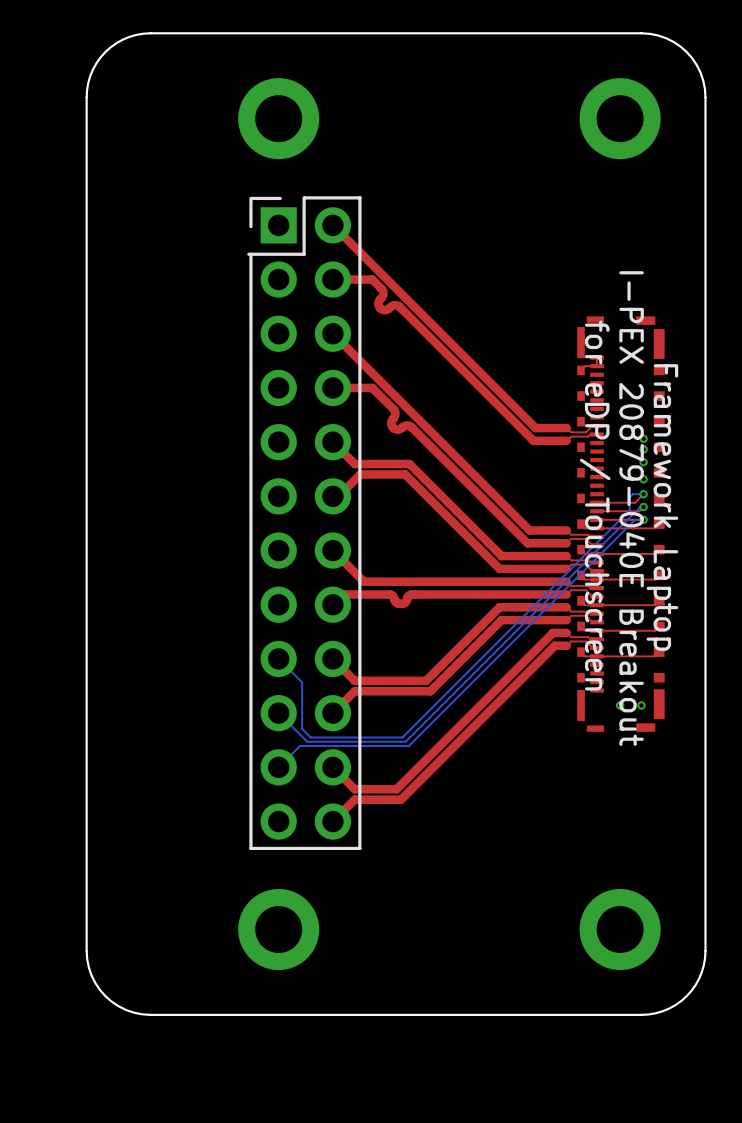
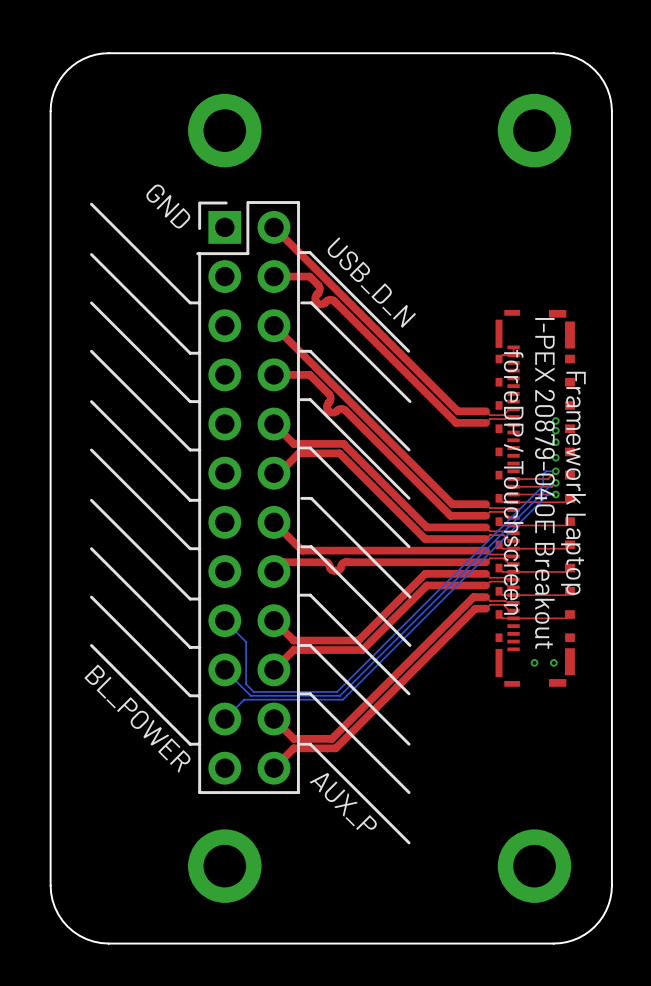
text: none -> GND (168, 206)
line: none -> (91, 204) (190, 302) (199, 302)
line: none -> (300, 252) (309, 252) (408, 351)
line: none -> (91, 254) (190, 353) (199, 353)
text: none -> USB_D_N (371, 282)
line: none -> (91, 302) (190, 401) (199, 401)
line: none -> (301, 302) (311, 302) (410, 401)
line: none -> (91, 351) (190, 449) (199, 449)
line: none -> (300, 351) (310, 351) (409, 449)
line: none -> (300, 399) (310, 399) (409, 498)
line: none -> (91, 401) (190, 500) (199, 500)
line: none -> (300, 448) (310, 448) (409, 546)
line: none -> (91, 449) (190, 548) (199, 548)
line: none -> (301, 498) (311, 498) (410, 597)
line: none -> (91, 500) (190, 599) (199, 599)
line: none -> (301, 546) (311, 546) (410, 645)
line: none -> (91, 548) (190, 647) (199, 647)
line: none -> (300, 595) (310, 595) (409, 693)
line: none -> (91, 597) (190, 695) (199, 695)
line: none -> (91, 645) (190, 744) (199, 744)
line: none -> (300, 645) (310, 645) (409, 744)
line: none -> (300, 693) (310, 693) (409, 792)
text: none -> BL_POWER (137, 718)
line: none -> (300, 744) (310, 744) (409, 842)
text: none -> AUX_P (343, 801)

